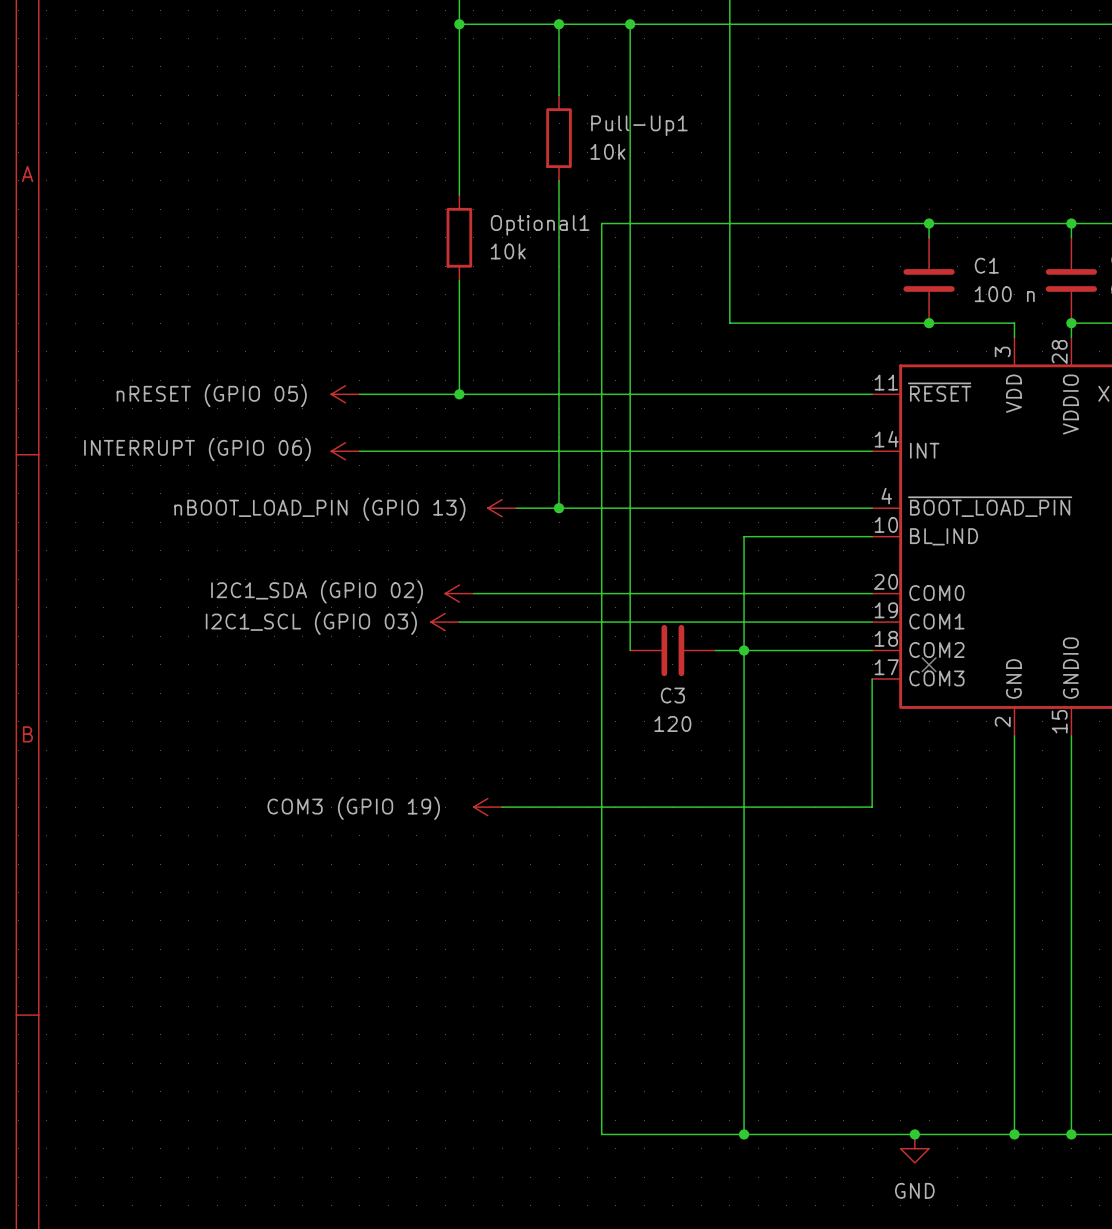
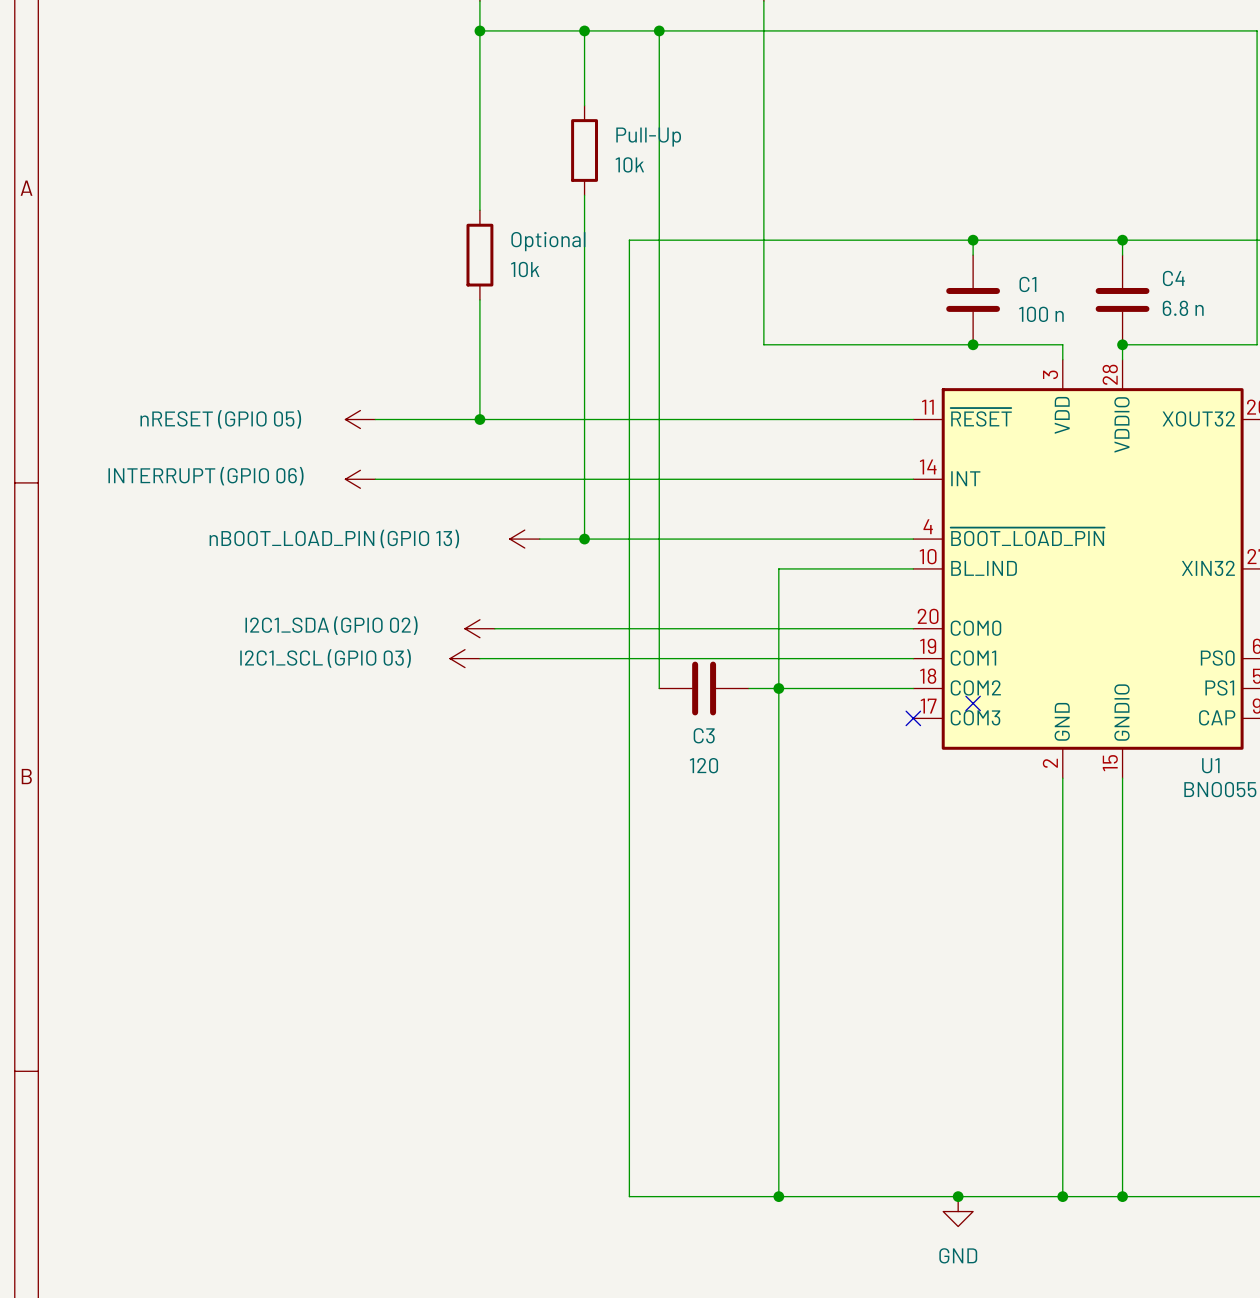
Pull-Up1 name: Pull-Up1 (639, 125) -> Pull-Up (648, 137)
Optional1 name: Optional1 (540, 225) -> Optional (548, 241)
wire: (872, 678) (872, 807) (502, 807) -> none
no-connect mark: none -> (913, 718)
power symbol: COM3 (GPIO 19) (487, 807) -> none

